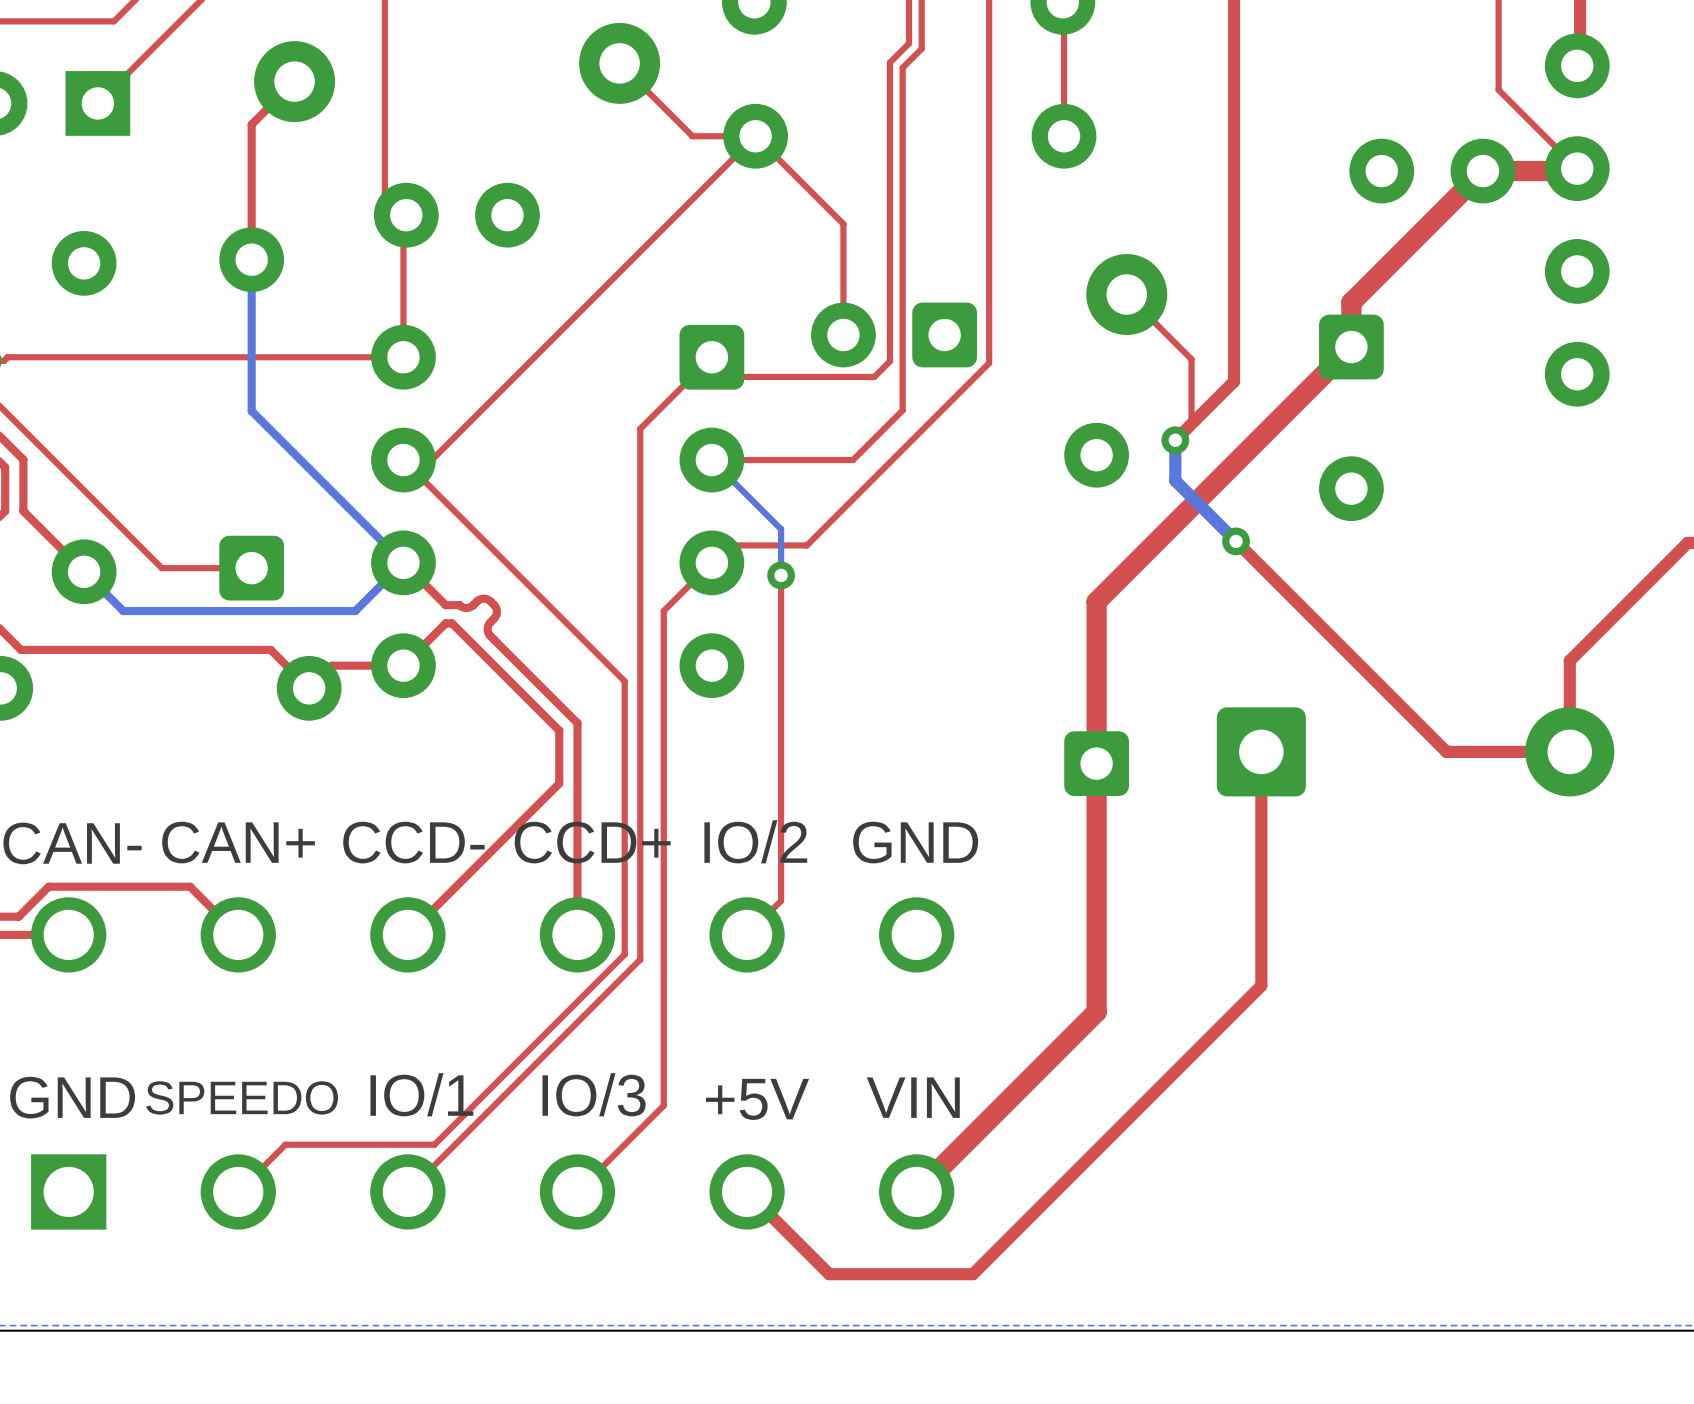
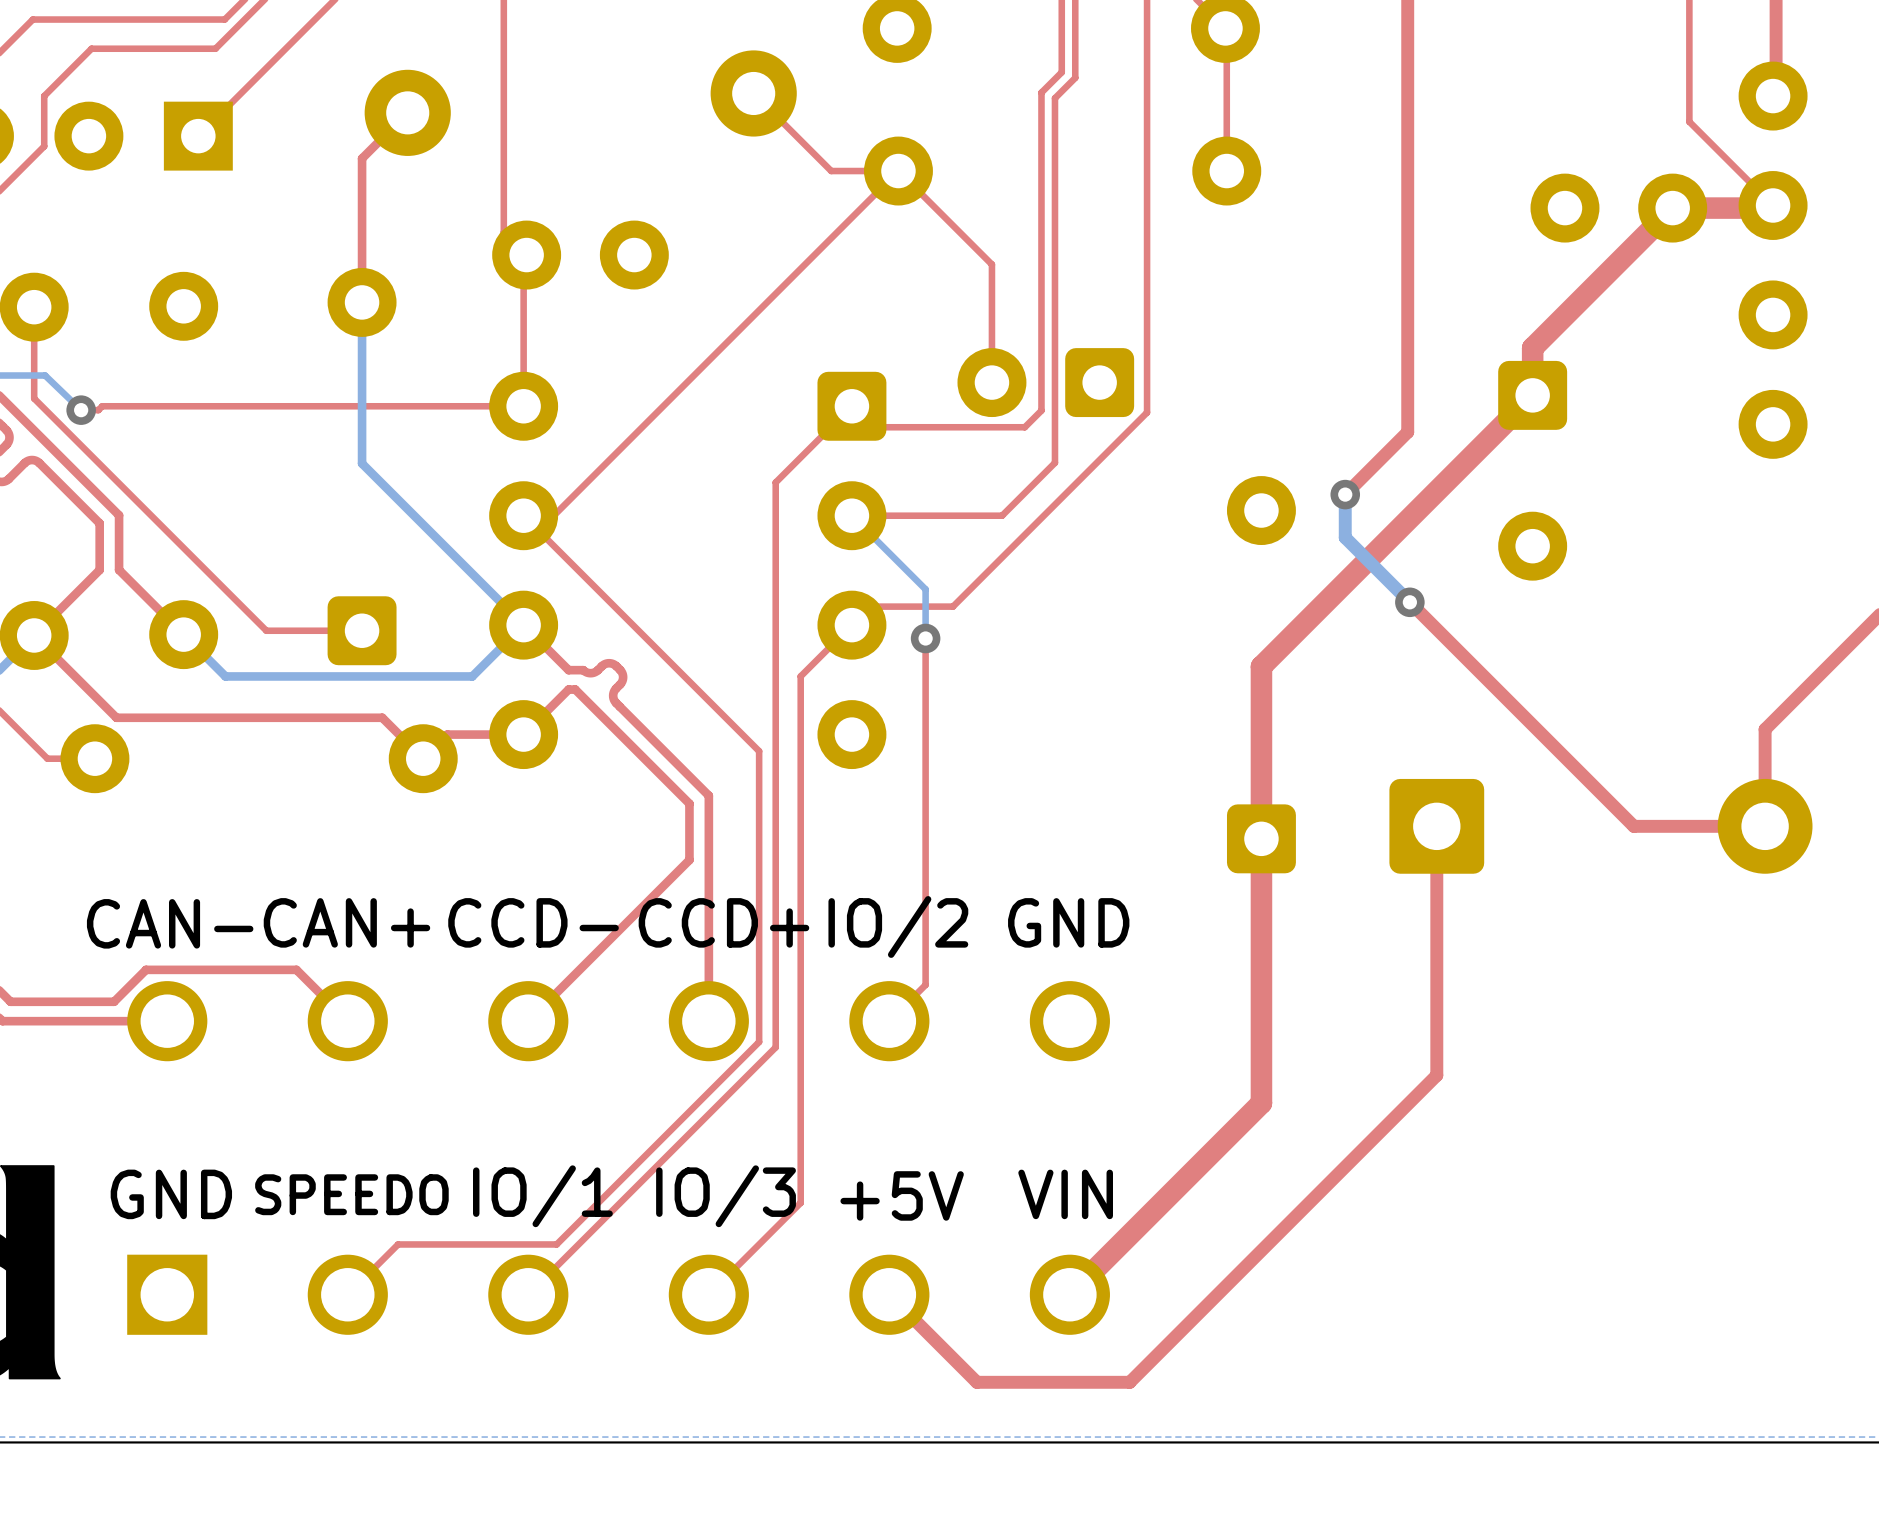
top track: (1126, 294) (1191, 359) (1191, 424) -> none
part: (1126, 294) -> none

